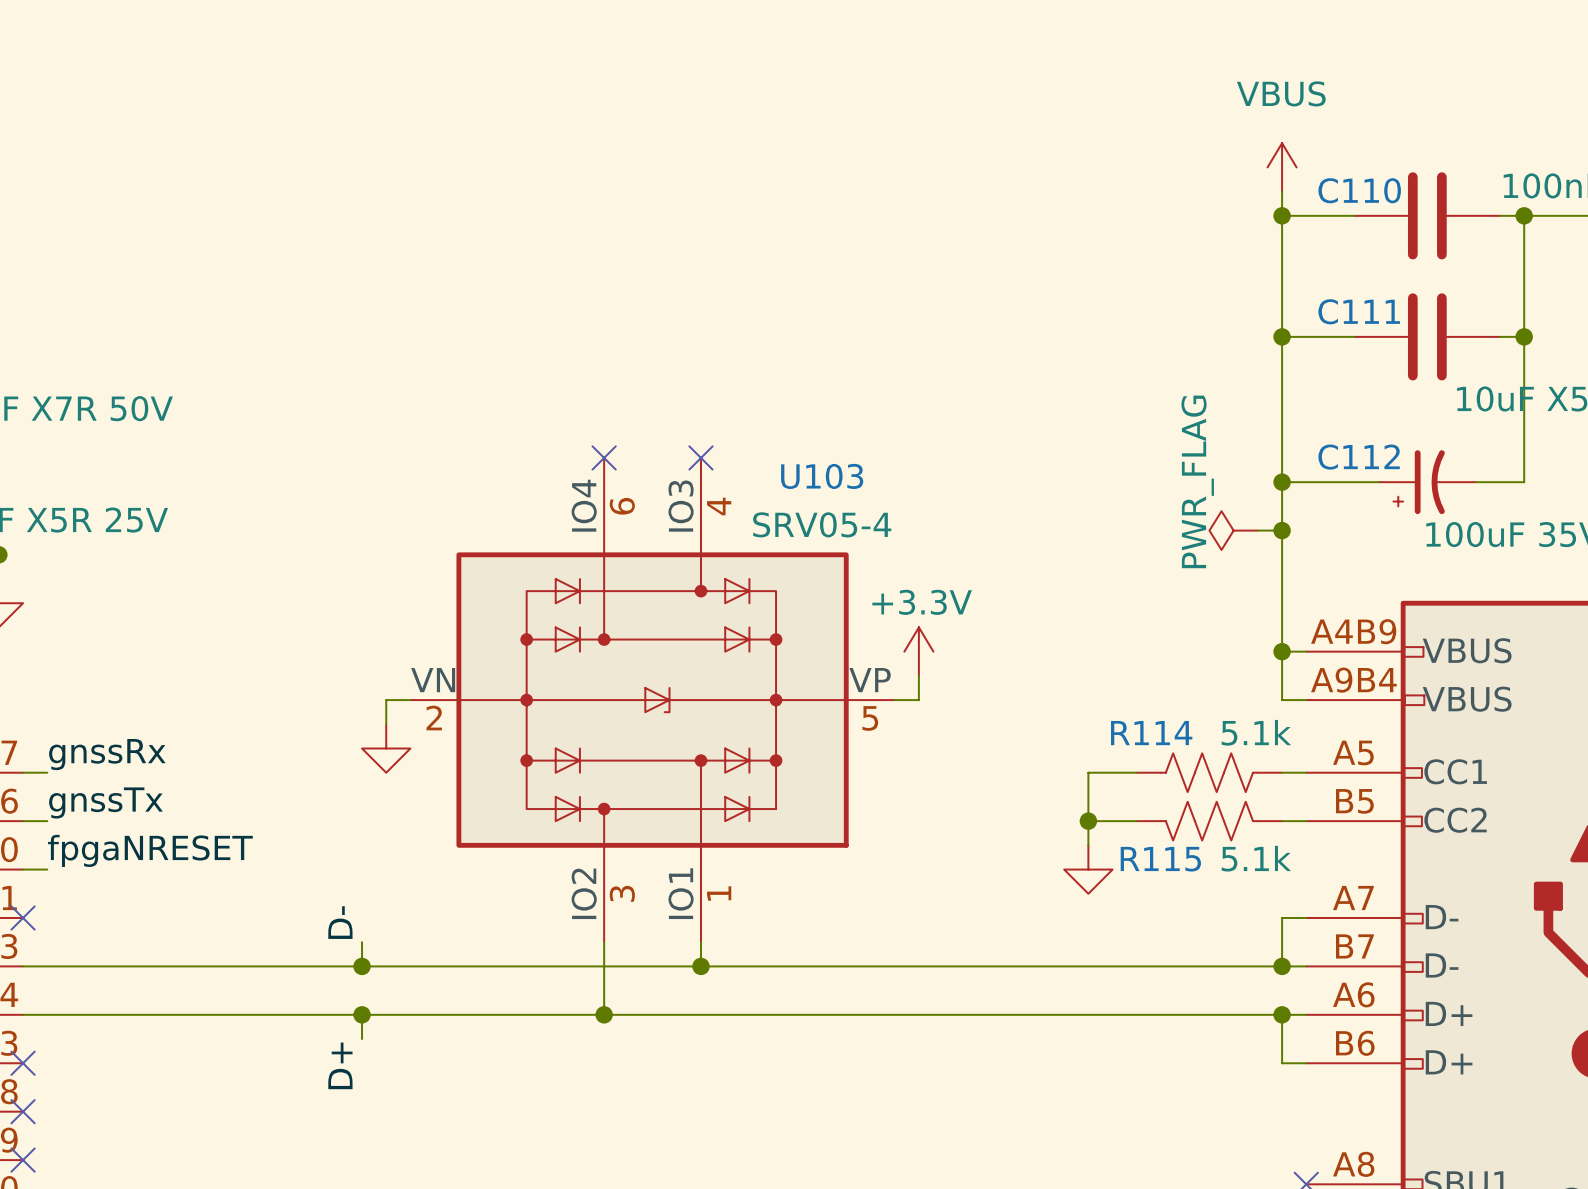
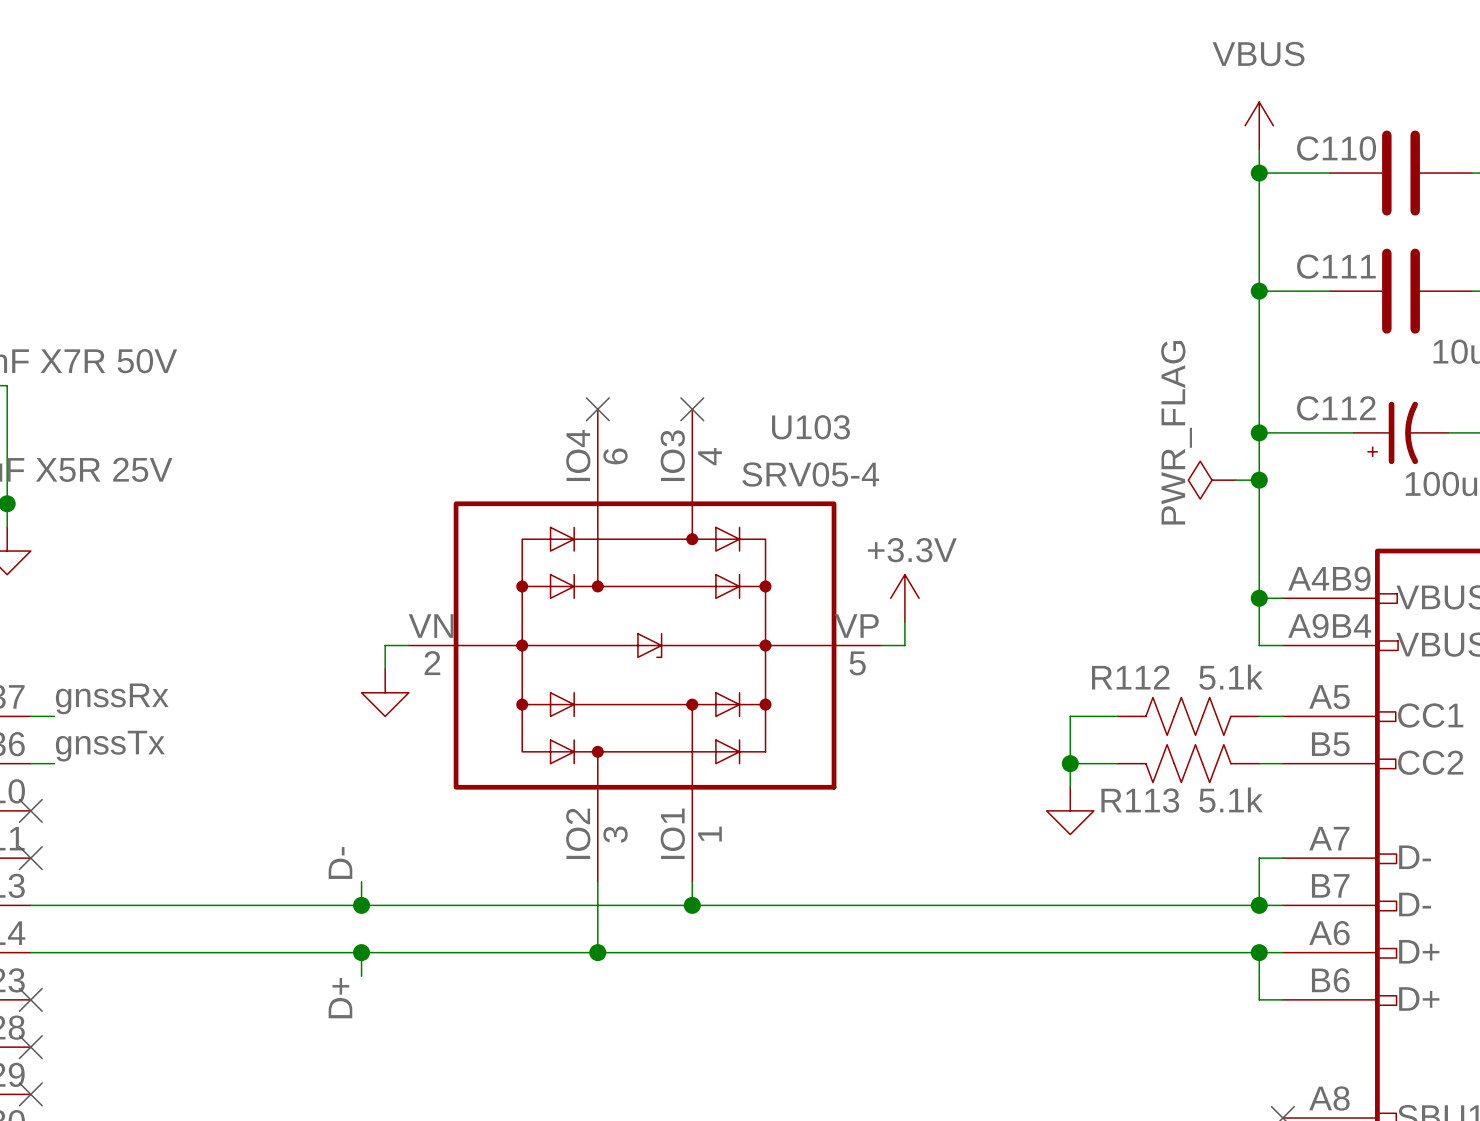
R114 name: R114 (1151, 733) -> R112 (1130, 677)
label: fpgaNRESET (150, 850) -> none
R115 name: R115 (1160, 859) -> R113 (1140, 800)
wire: (23, 869) (47, 869) -> none
no-connect mark: none -> (30, 810)

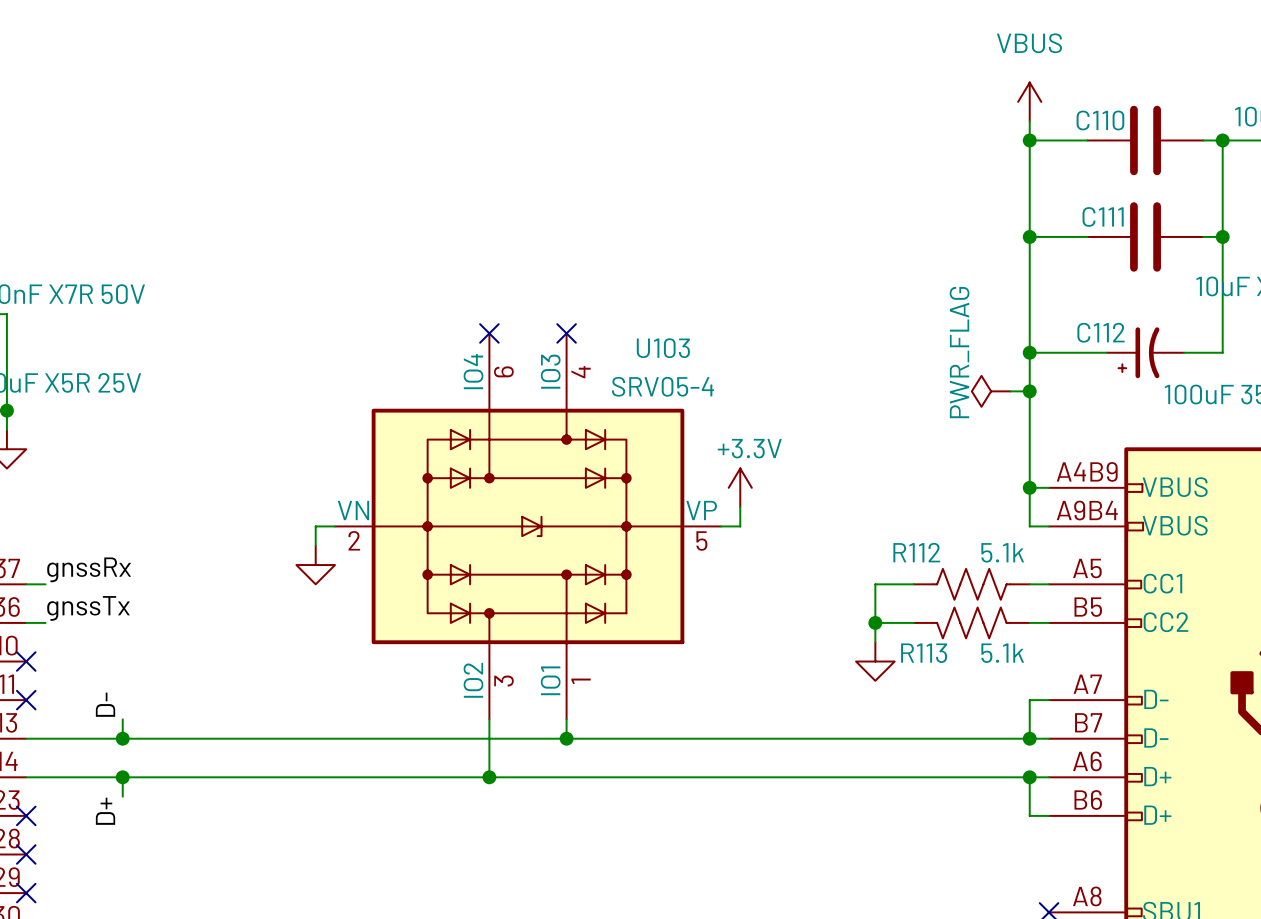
label position: D- (340, 863) -> D- (105, 704)
wire: (361, 881) (361, 905) -> (122, 719) (122, 738)
junction: none -> (122, 738)
junction: (361, 905) -> none
junction: none -> (122, 777)
wire: (361, 952) (361, 976) -> (122, 777) (122, 796)
junction: (361, 952) -> none
label position: D+ (340, 998) -> D+ (105, 811)

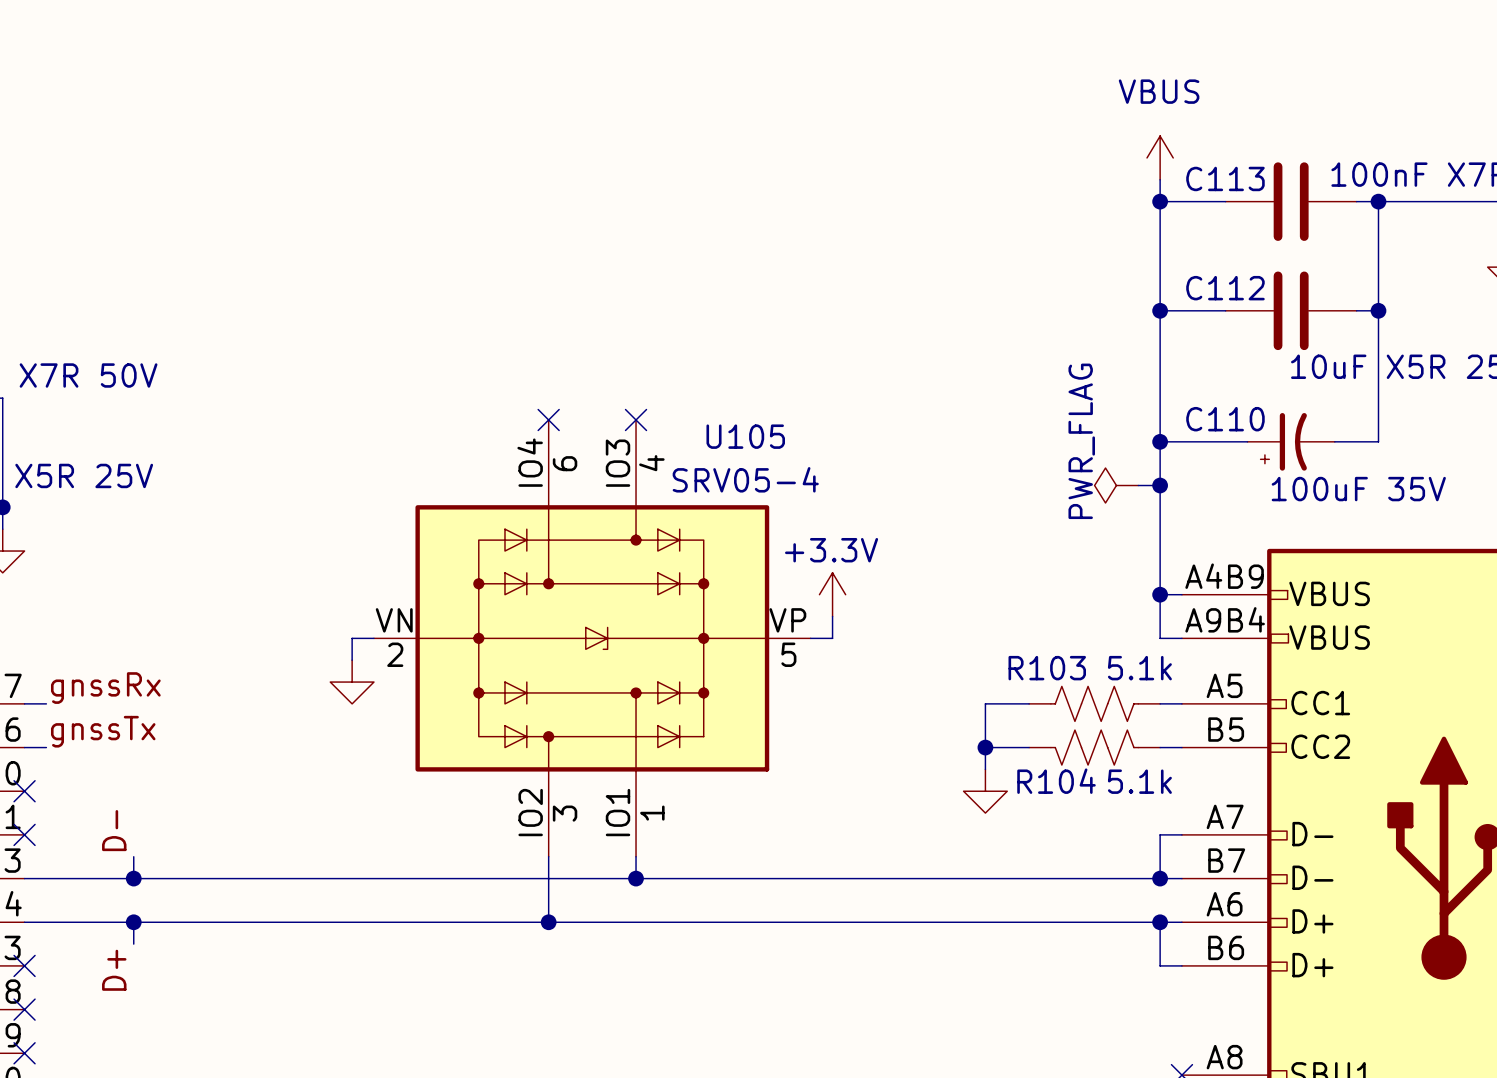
C110 name: C110 (1100, 120) -> C113 (1225, 178)
C111 name: C111 (1103, 216) -> C112 (1225, 288)
C112 name: C112 (1101, 332) -> C110 (1225, 419)
U103 name: U103 (663, 348) -> U105 (745, 436)
R112 name: R112 (916, 552) -> R103 (1047, 668)
R113 name: R113 (924, 653) -> R104 (1056, 781)

